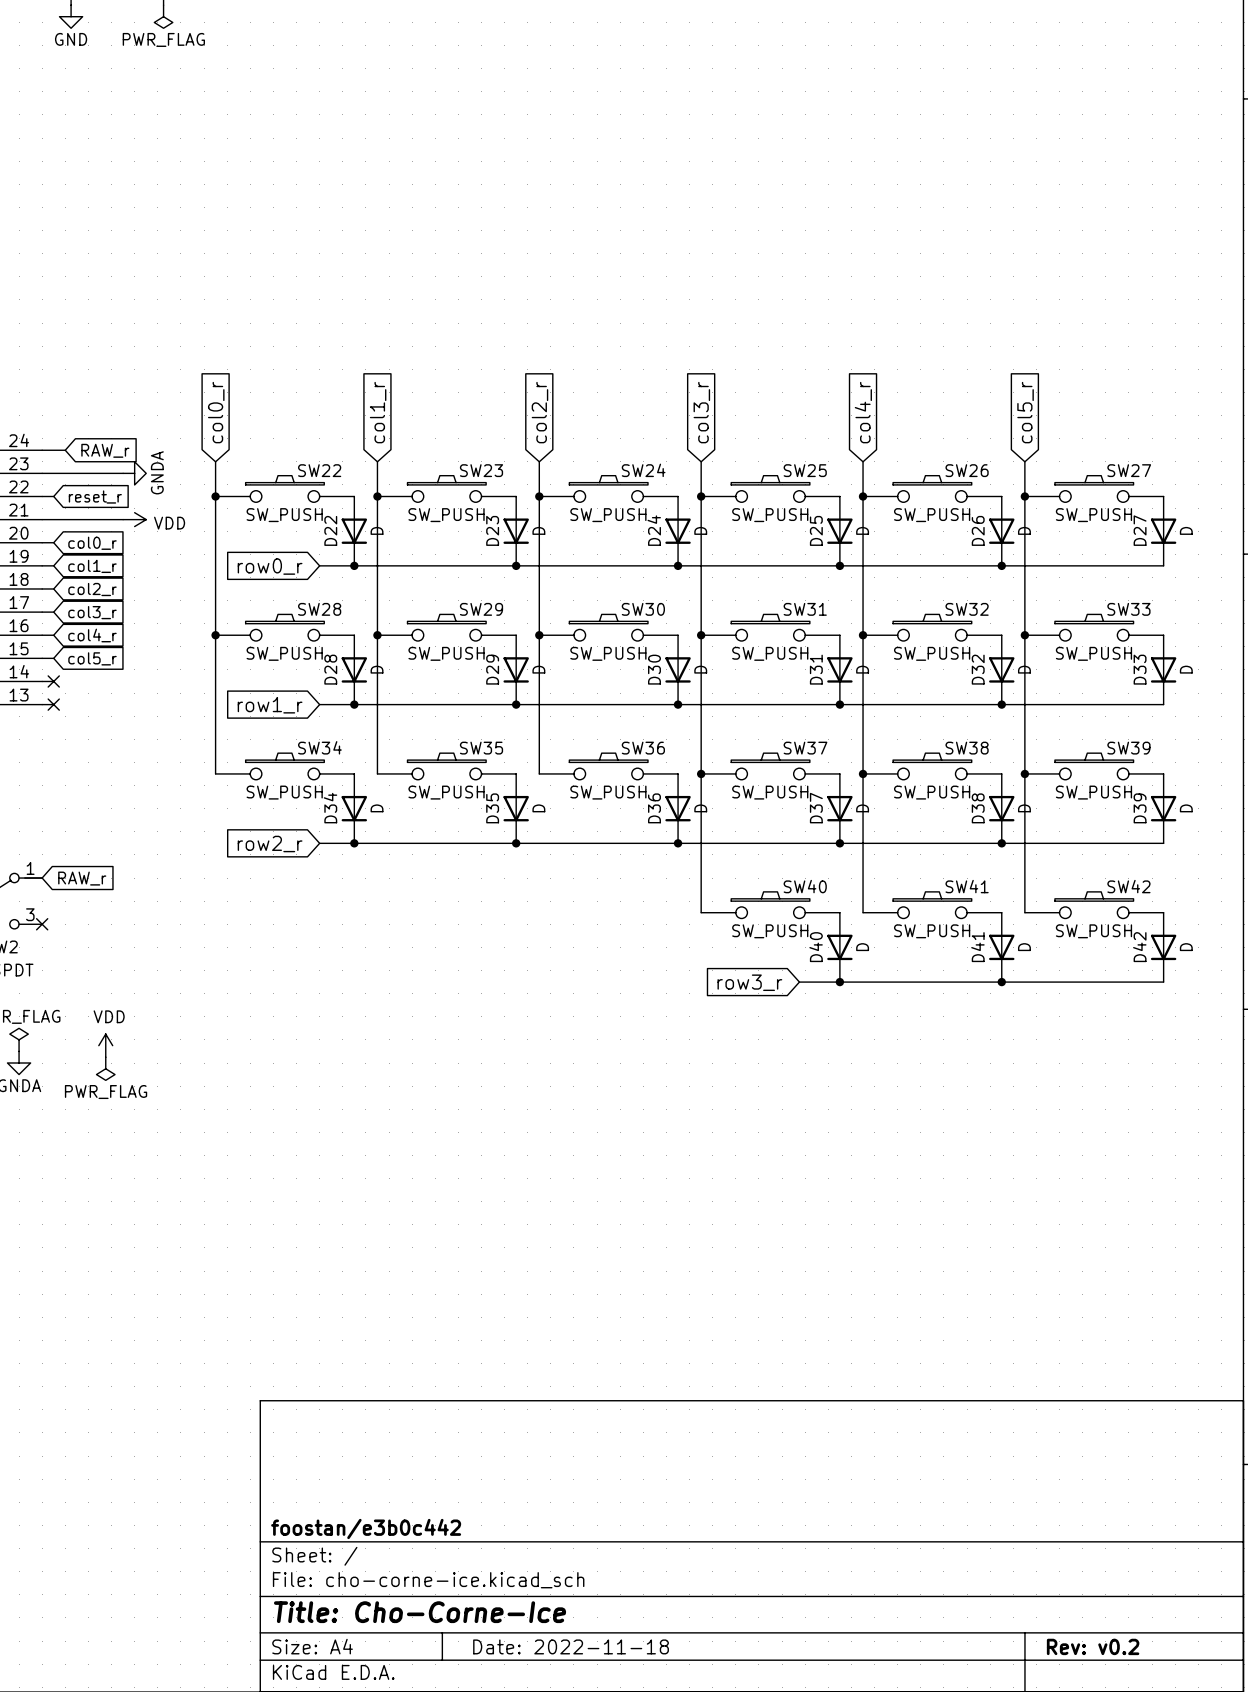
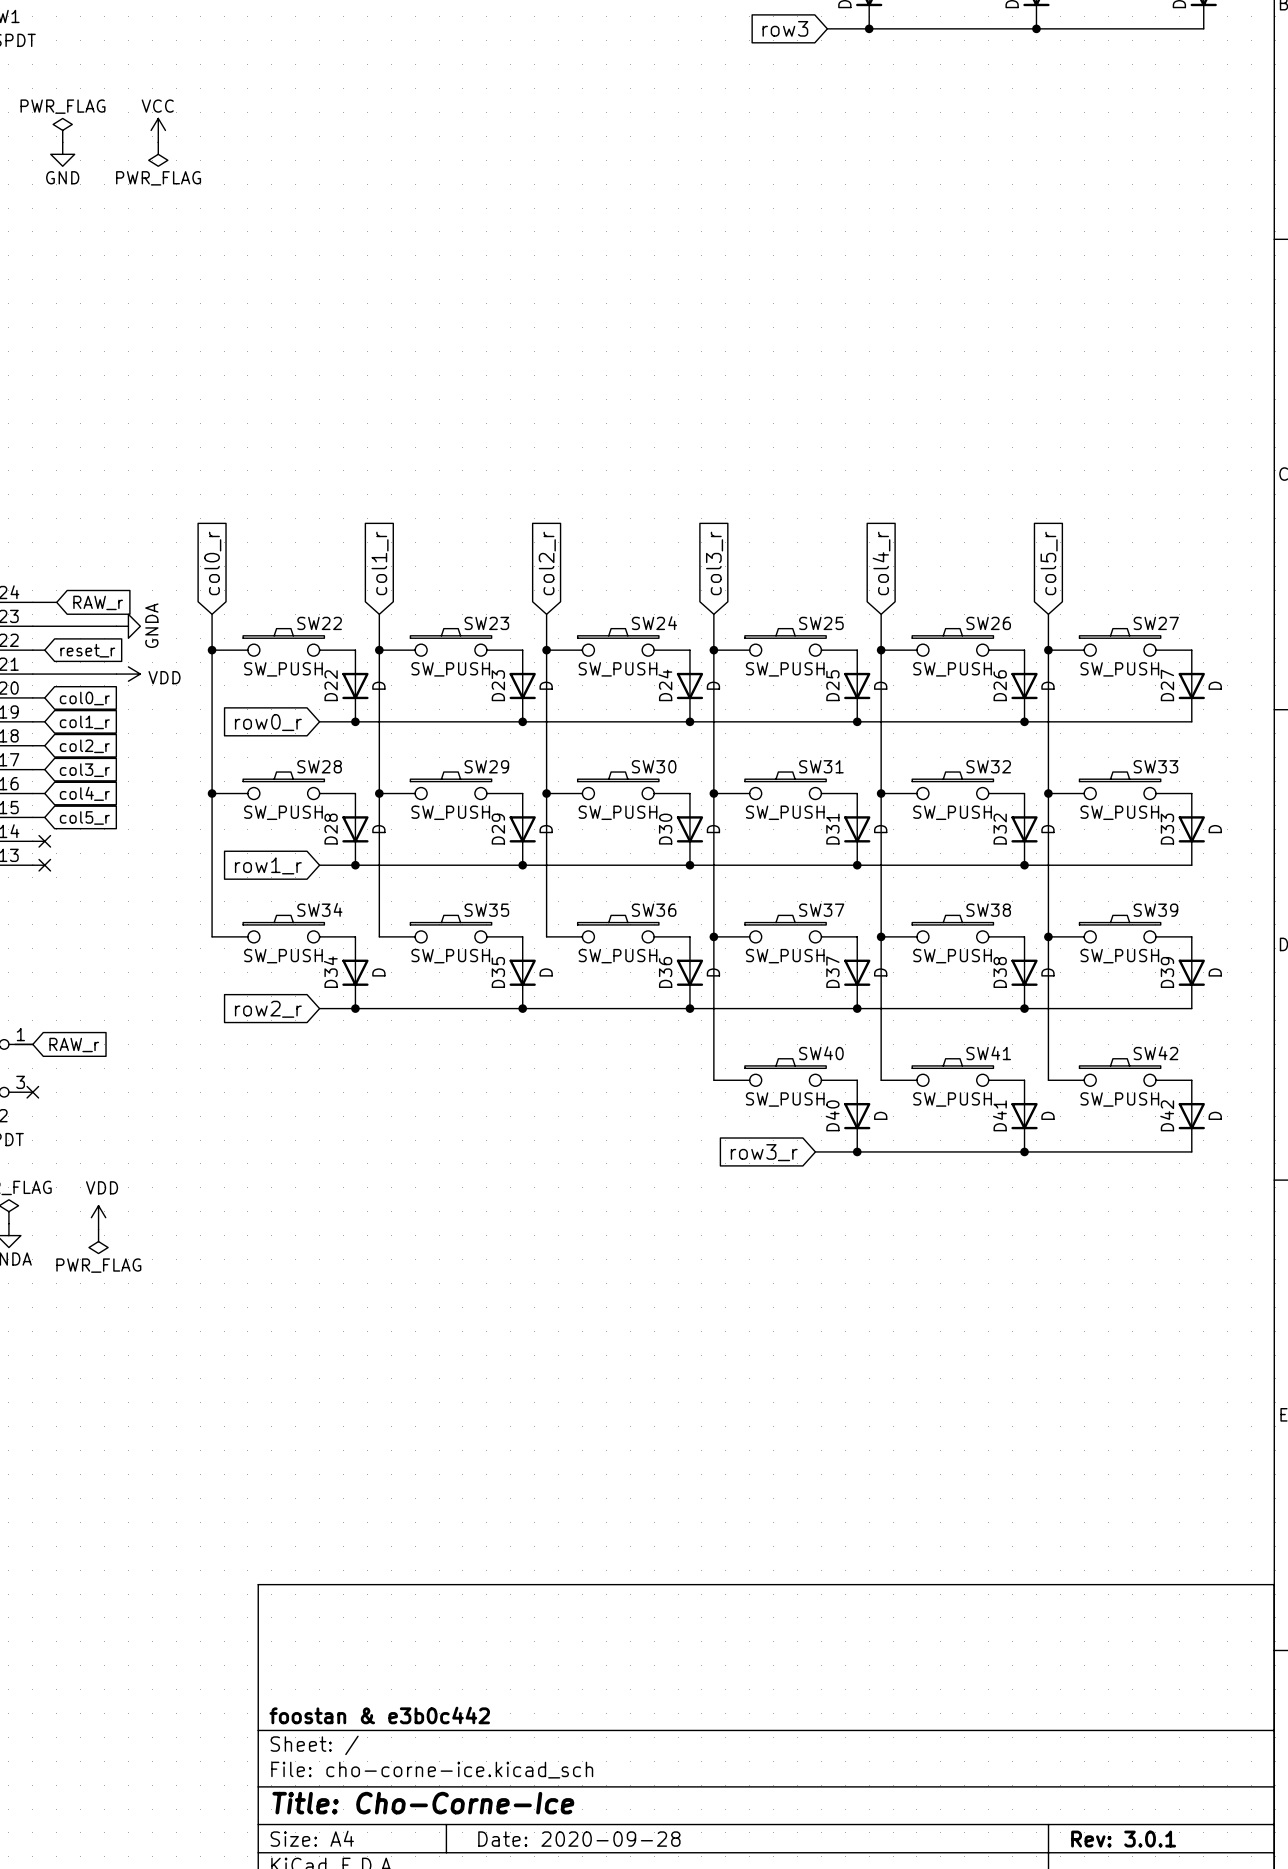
title block: foostan/e3b0c442 (366, 1528) -> foostan & e3b0c442 (379, 1715)
title block: Date: 2022-11-18 (571, 1646) -> Date: 2020-09-28 (579, 1839)
title block: Rev: v0.2 (1093, 1646) -> Rev: 3.0.1 (1123, 1839)

